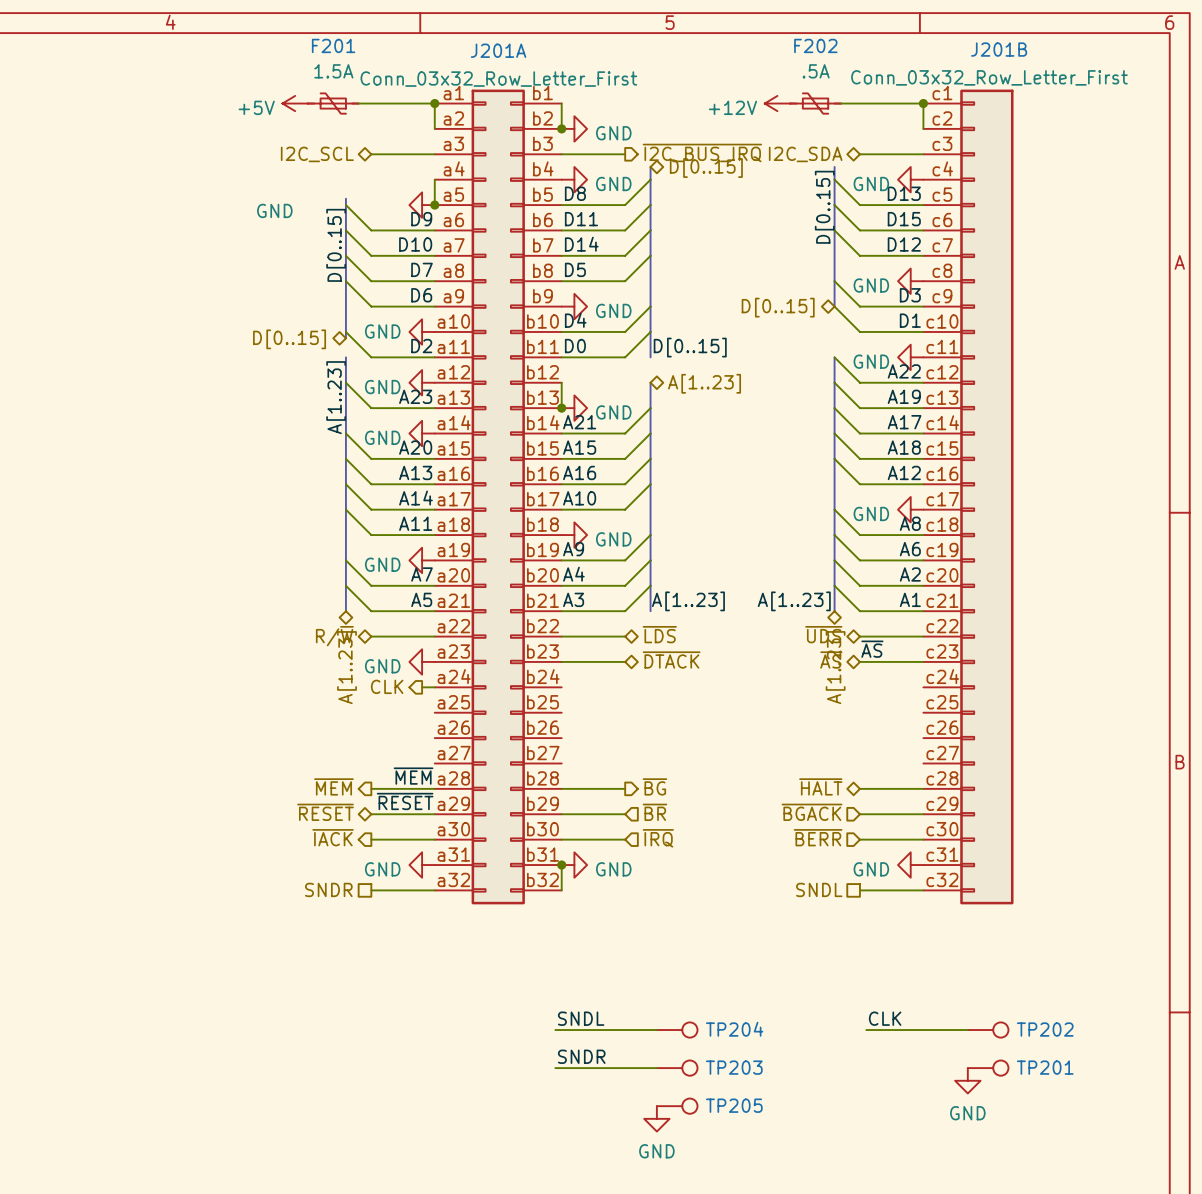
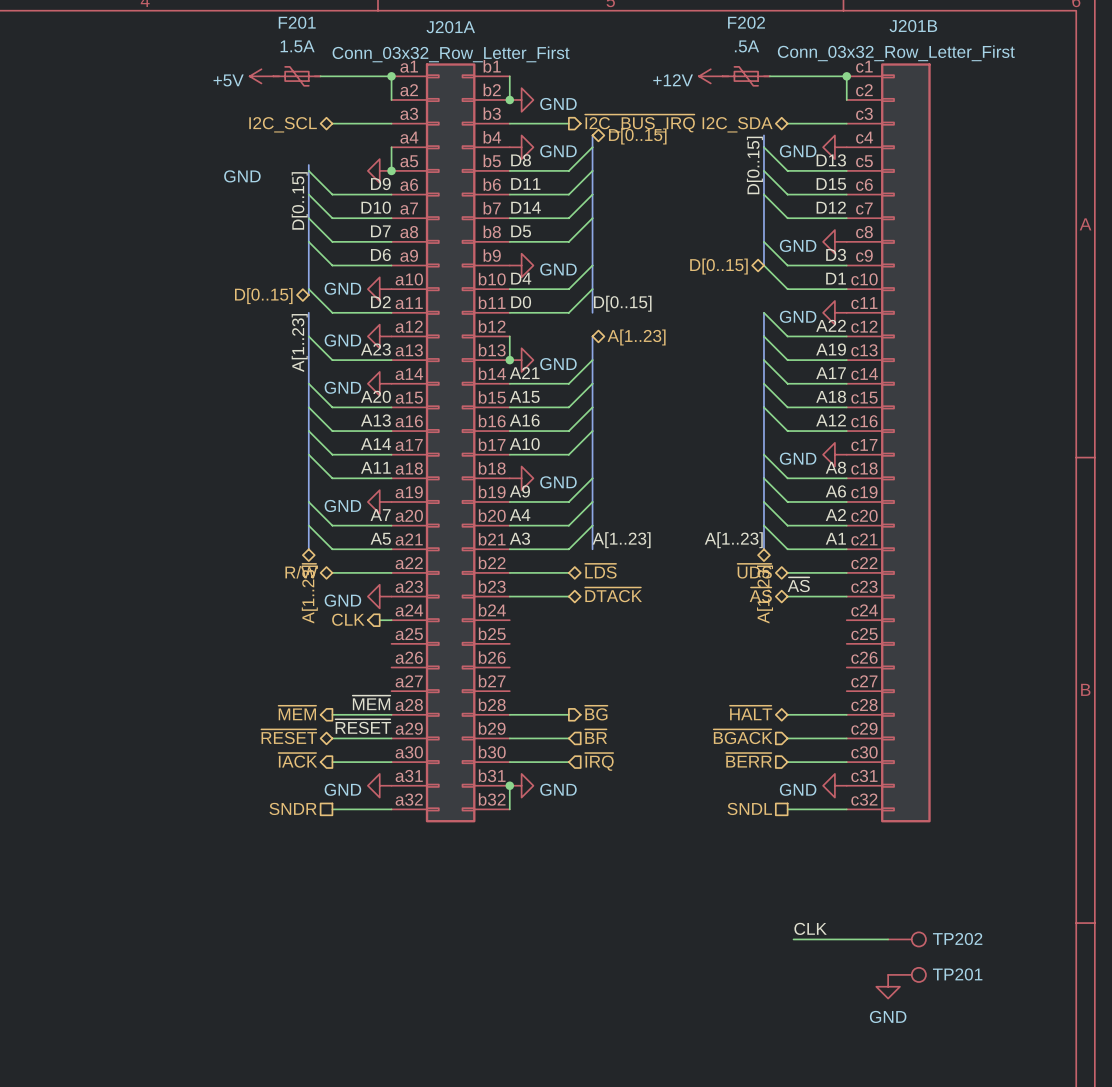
label: SNDL (581, 1018) -> none
wire: (555, 1030) (656, 1030) -> none
TP204: (677, 1030) -> none
label: SNDR (581, 1056) -> none
wire: (555, 1068) (656, 1068) -> none
TP203: (677, 1068) -> none
TP205: (677, 1106) -> none
power symbol: GND (656, 1118) -> none

